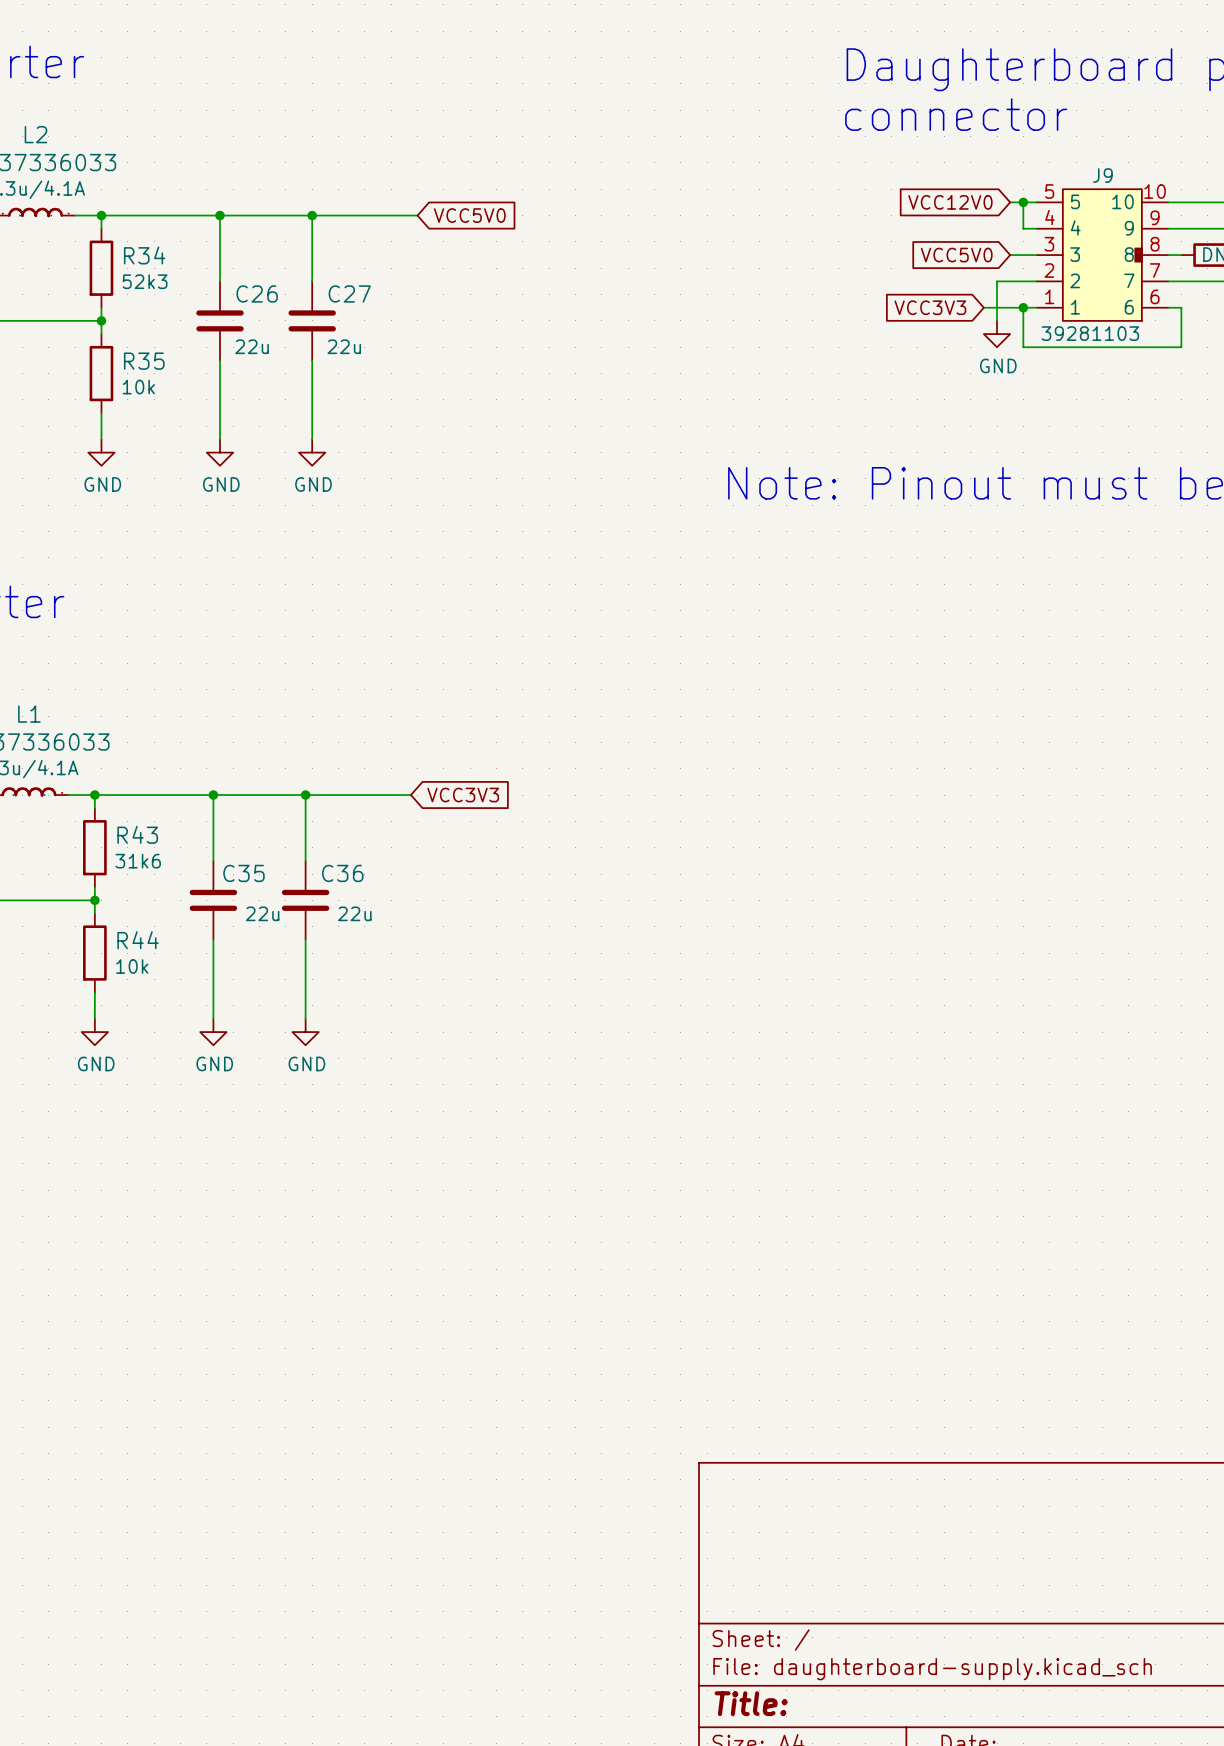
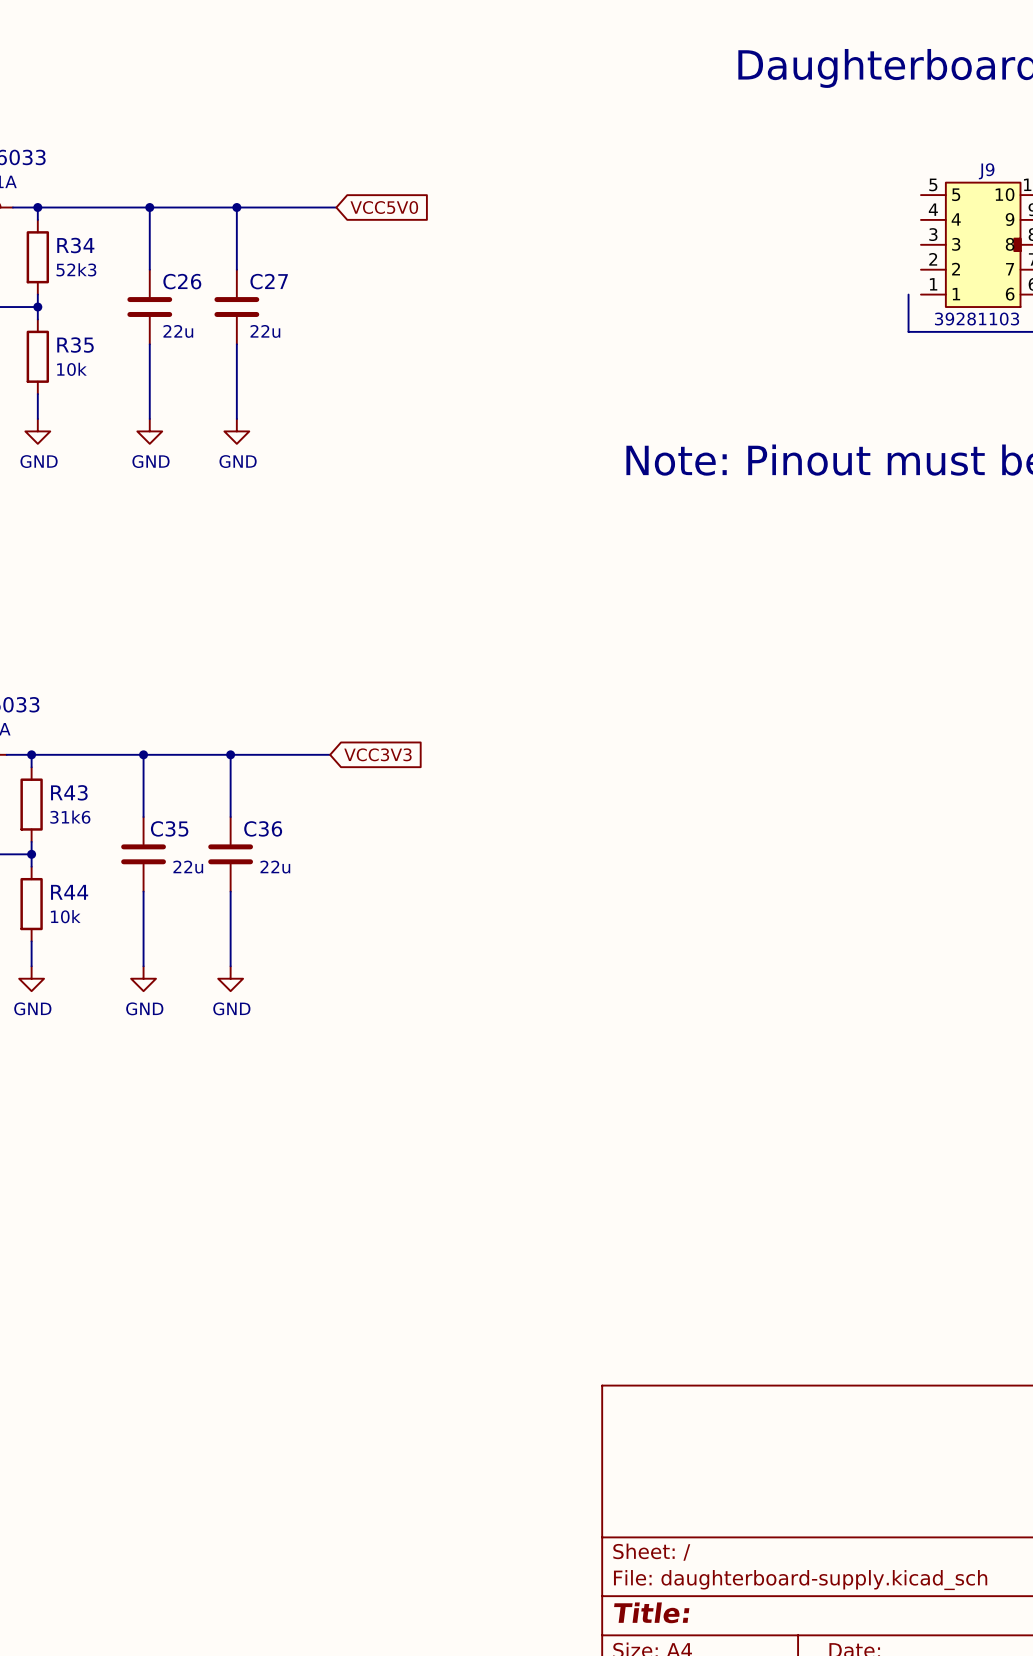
text: connector (956, 114) -> none
global label: VCC12V0 (950, 202) -> none
wire: (1010, 202) (1036, 202) -> none
wire: (1023, 202) (1023, 228) (1036, 228) -> none
junction: (1023, 202) -> none
global label: VCC5V0 (956, 255) -> none
wire: (1010, 255) (1036, 255) -> none
wire: (1036, 281) (997, 281) (997, 320) -> none
global label: VCC3V3 (930, 307) -> none
wire: (983, 307) (1036, 307) -> none
junction: (1023, 307) -> none
power symbol: GND (997, 334) -> none

